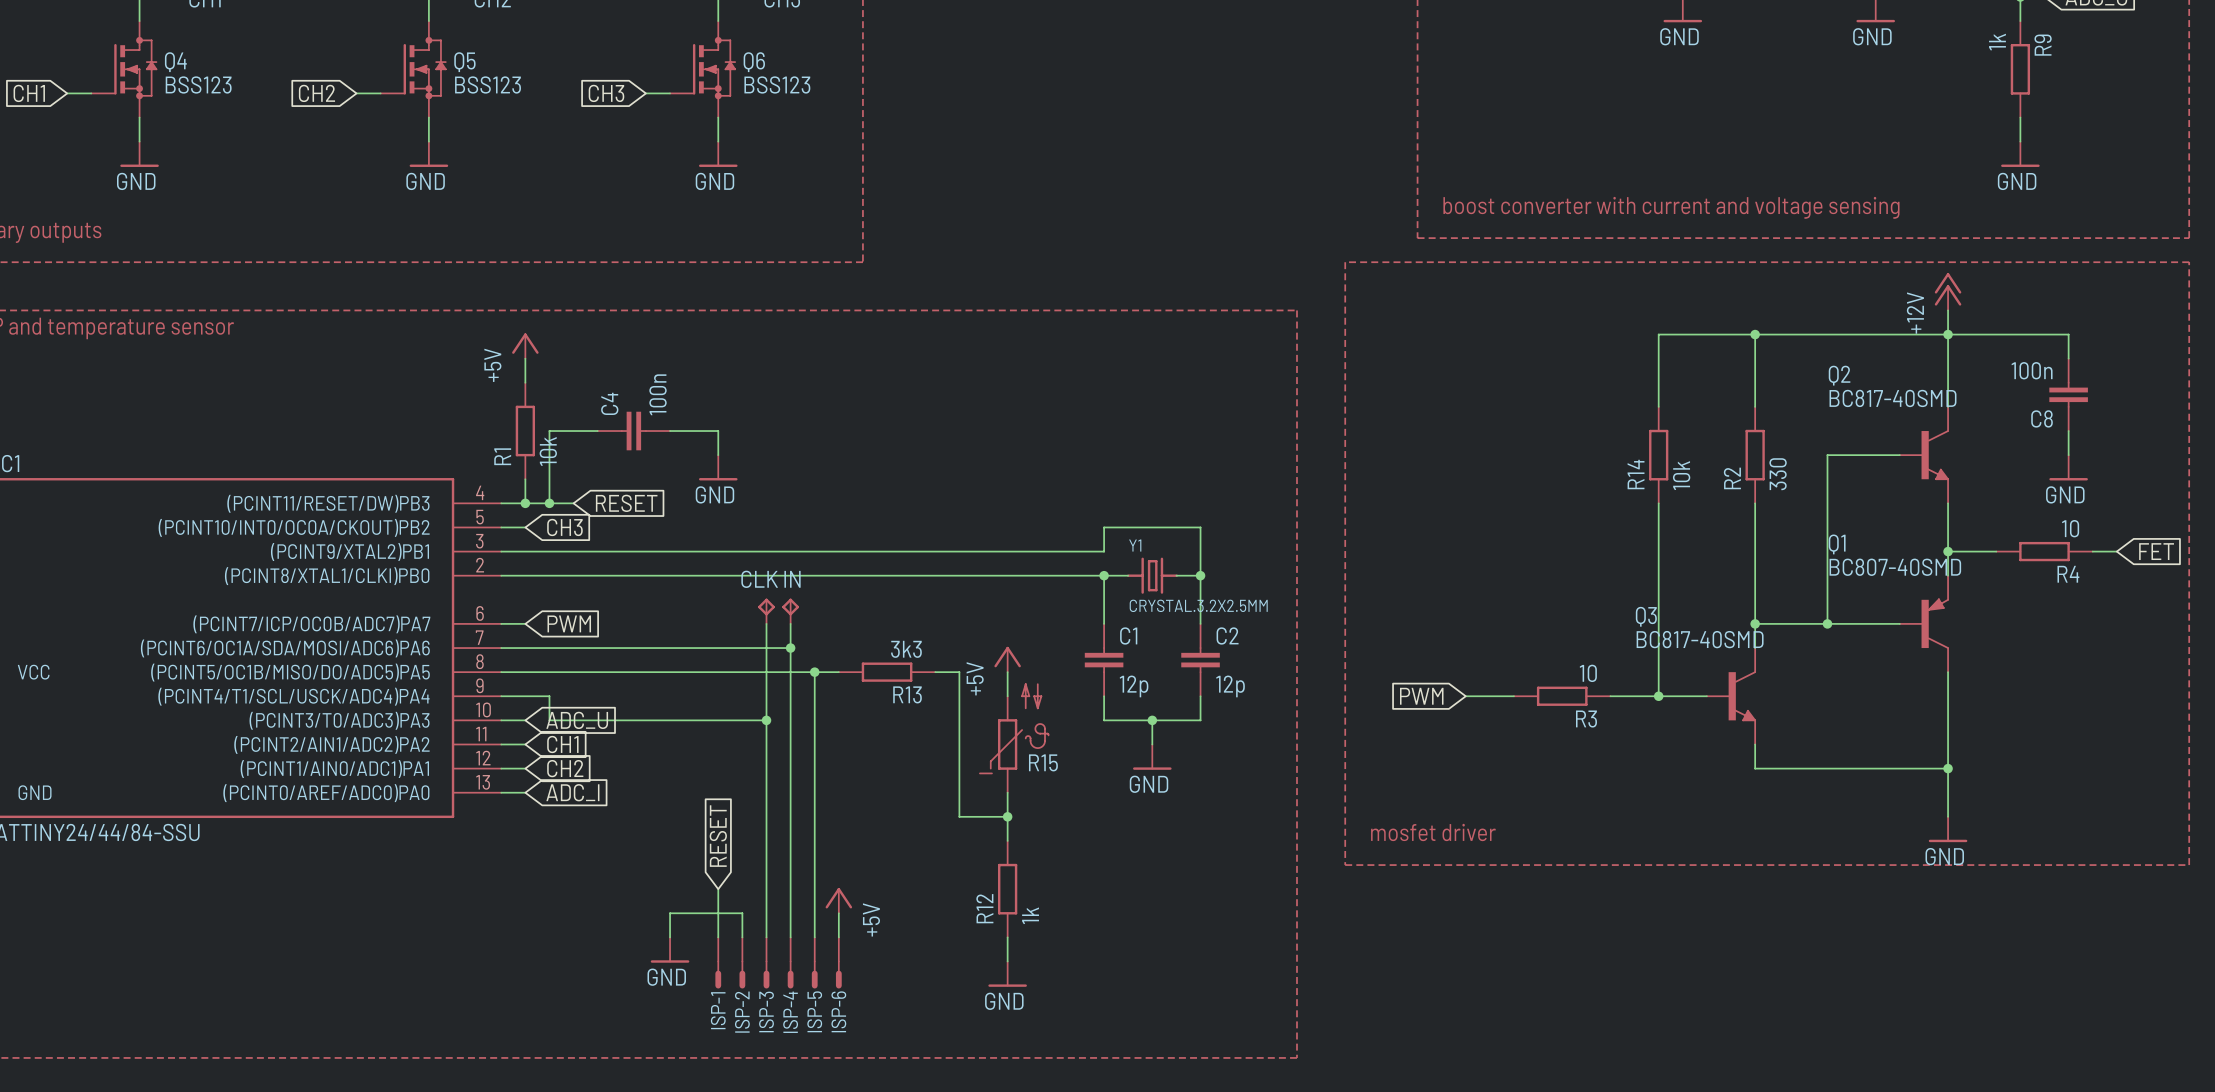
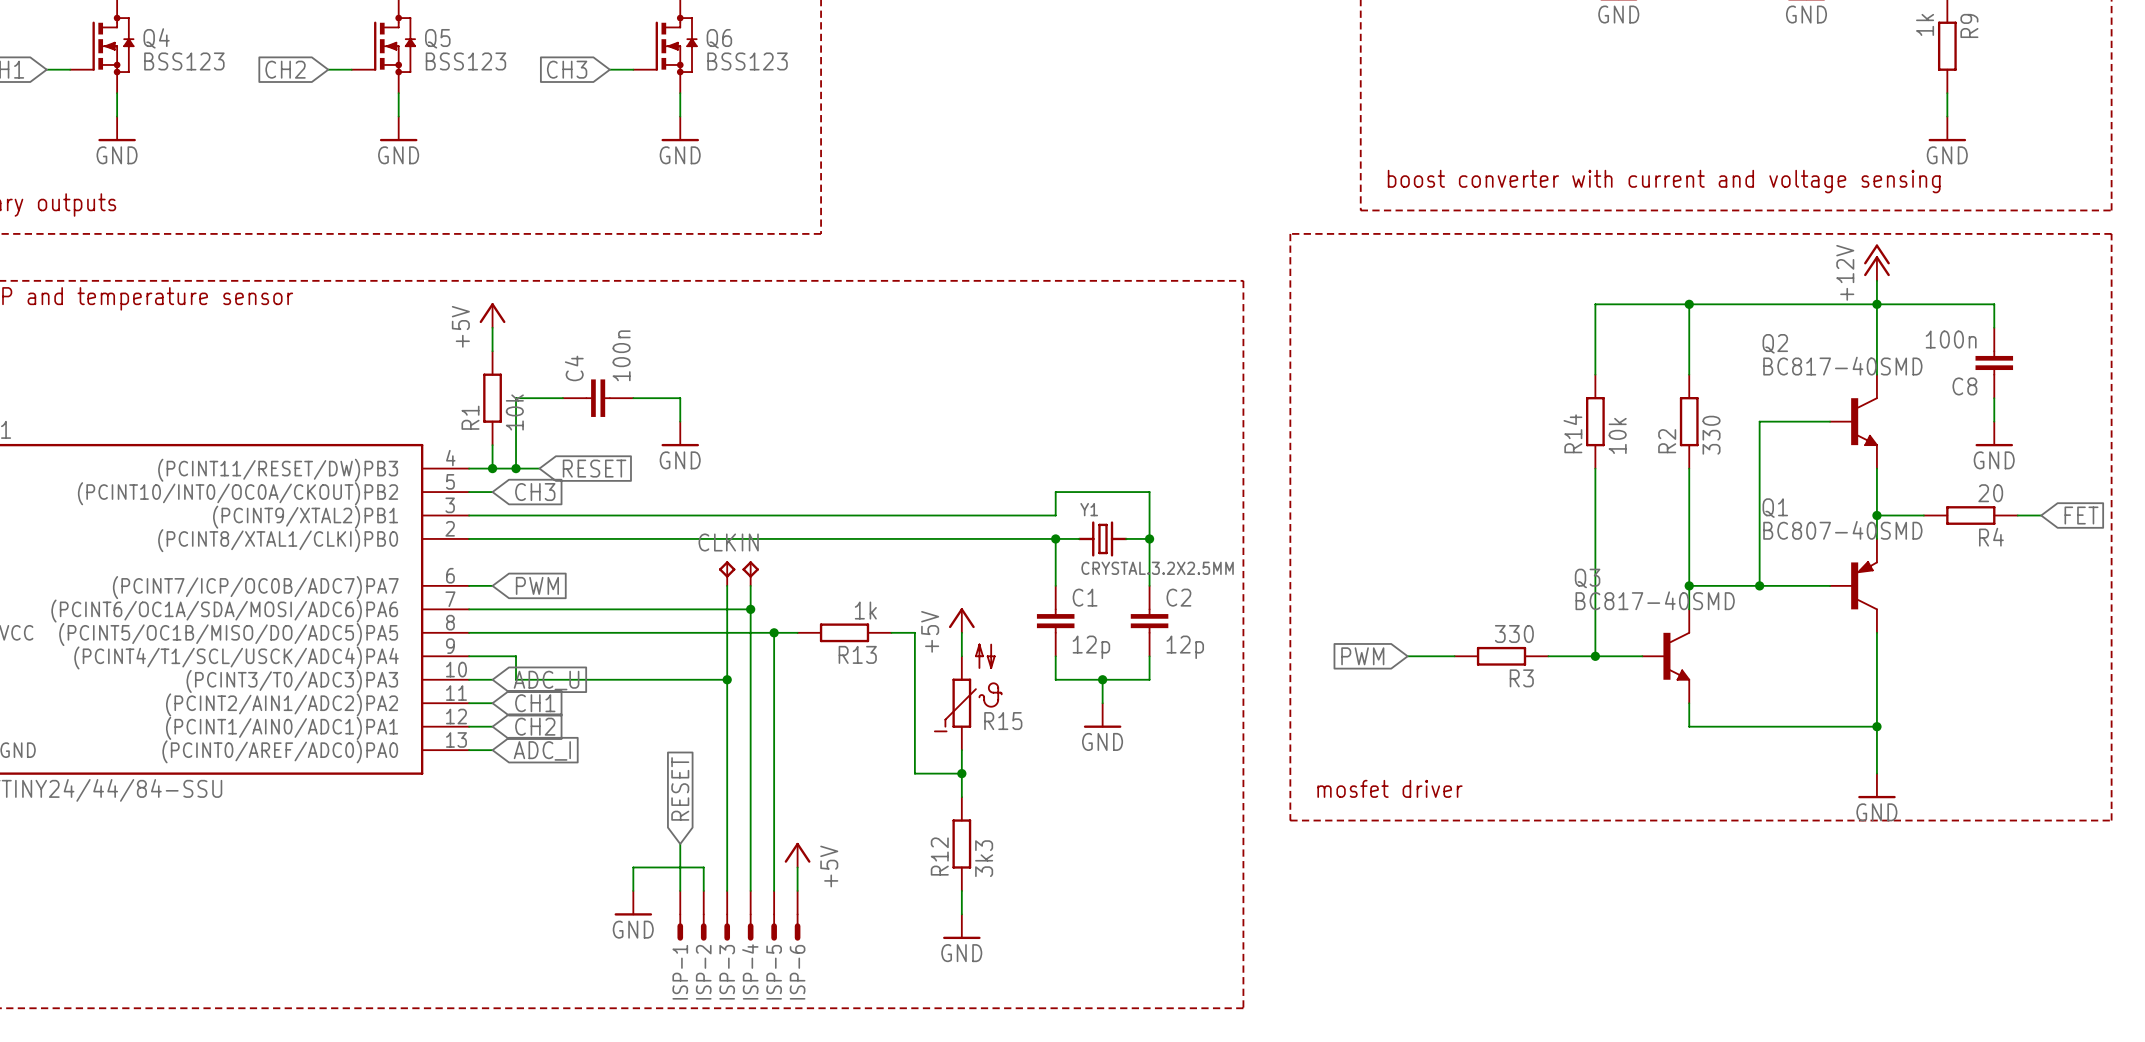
R4 value: 10 (2070, 528) -> 20 (1990, 493)
R13 value: 3k3 (906, 649) -> 1k (865, 610)
R3 value: 10 (1588, 673) -> 330 (1514, 634)
R12 value: 1k (1030, 915) -> 3k3 (984, 858)

